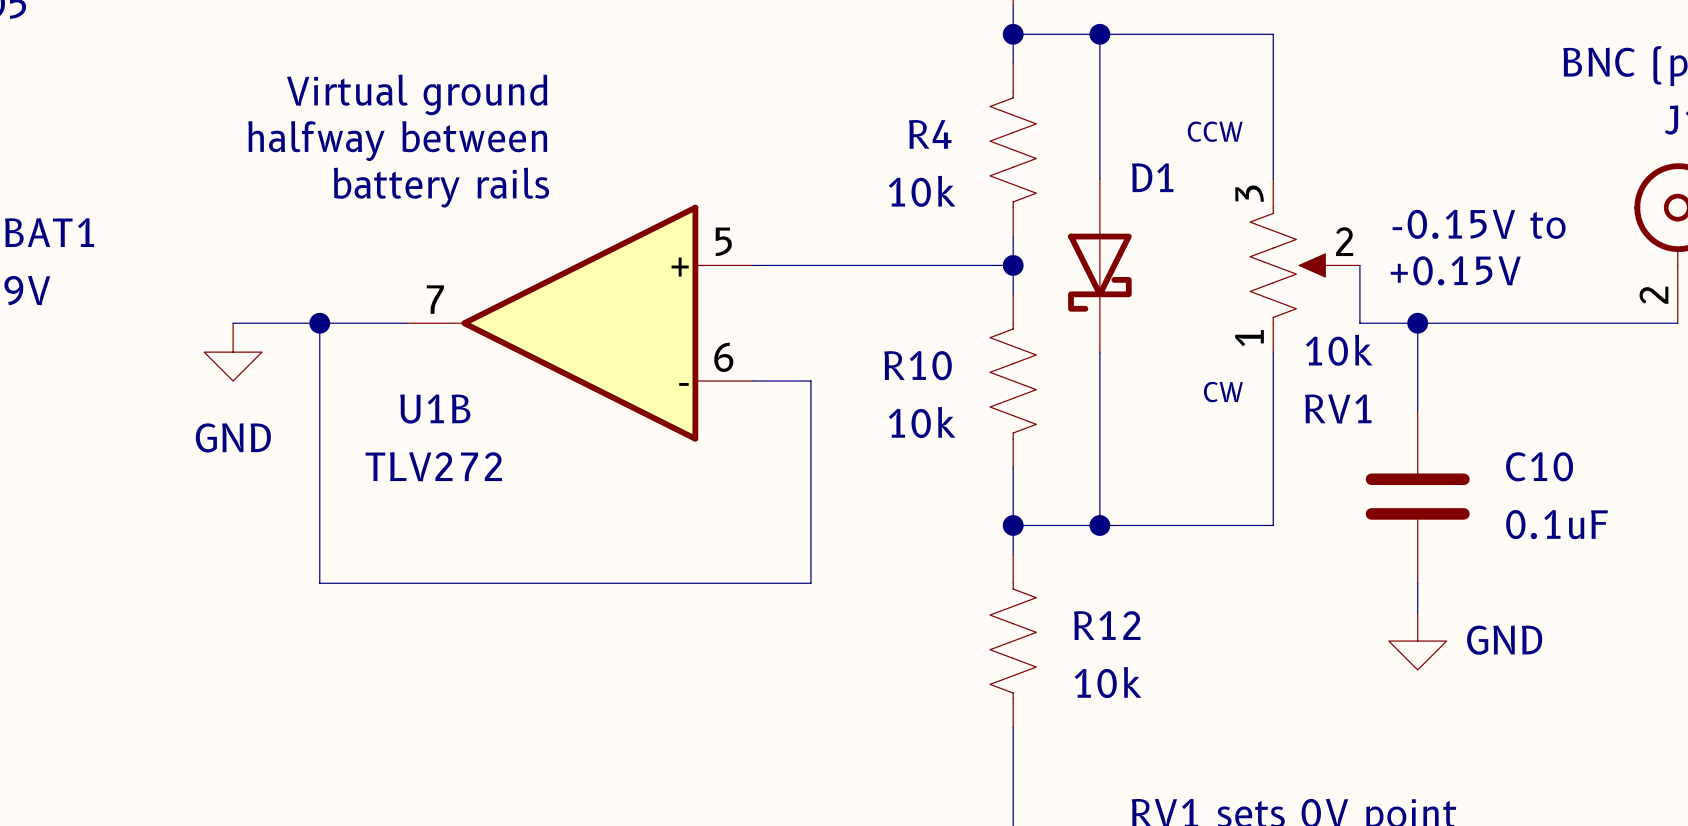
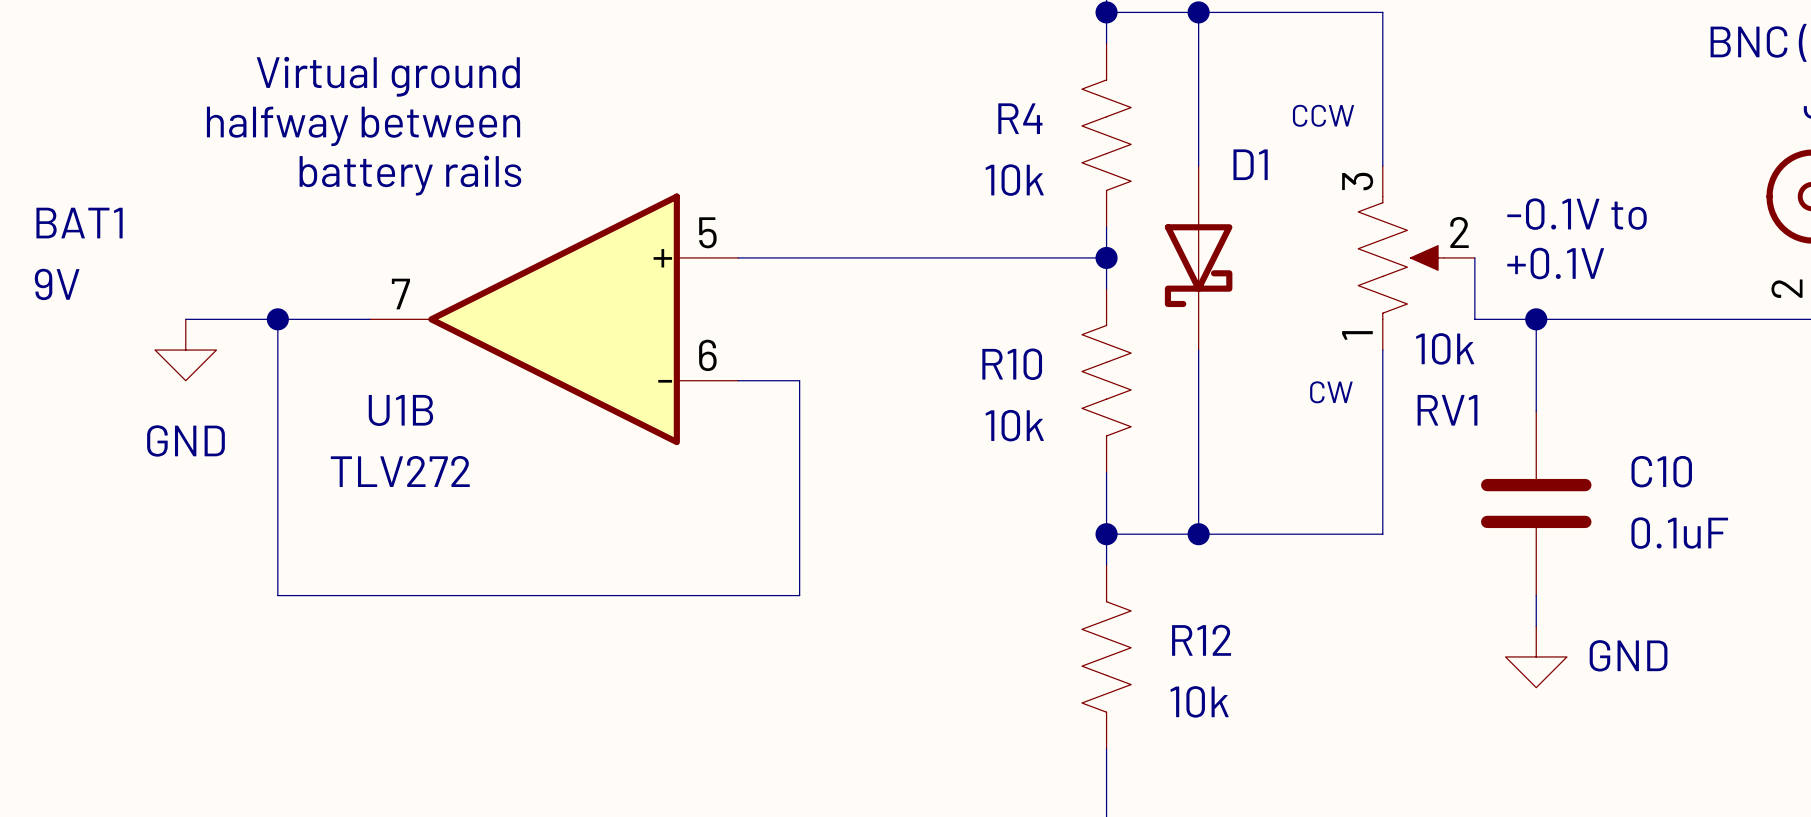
text position: Virtual ground (417, 94) -> Virtual ground (388, 76)
text position: halfway between (397, 141) -> halfway between (363, 126)
text position: battery rails (441, 187) -> battery rails (410, 175)
text: -0.15V to (1479, 224) -> -0.1V to (1577, 214)
text: +0.15V (1455, 270) -> +0.1V (1555, 263)
junction position: (319, 323) -> (277, 319)
wire: (406, 323) (319, 323) (319, 583) -> (185, 319) (277, 319) (277, 595) (369, 595)
U1B position: (579, 323) -> (554, 319)
power symbol position: GND (233, 352) -> GND (185, 350)
wire: (753, 381) (810, 381) (810, 583) (724, 583) -> (738, 380) (799, 380) (799, 595)

